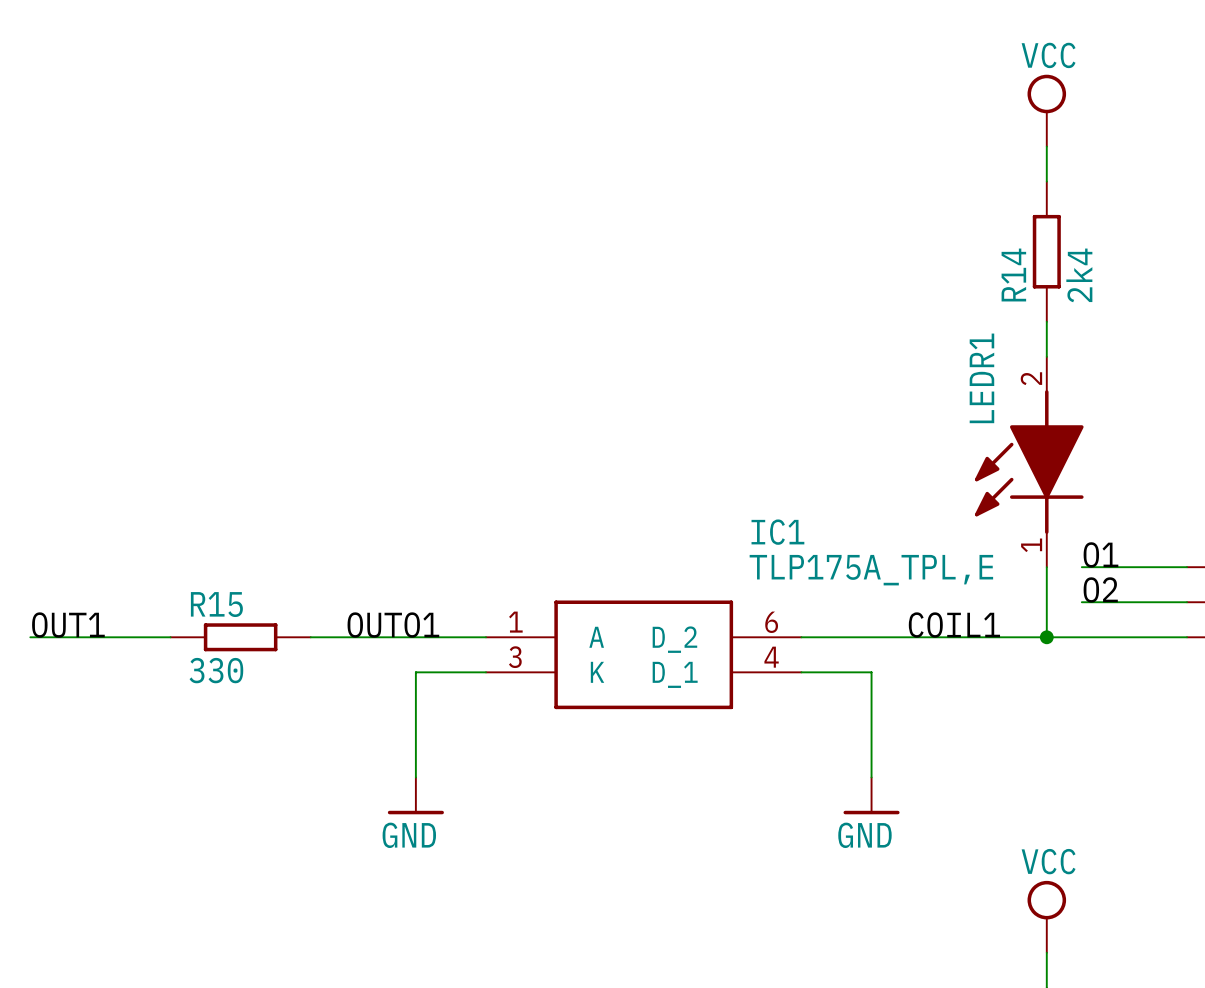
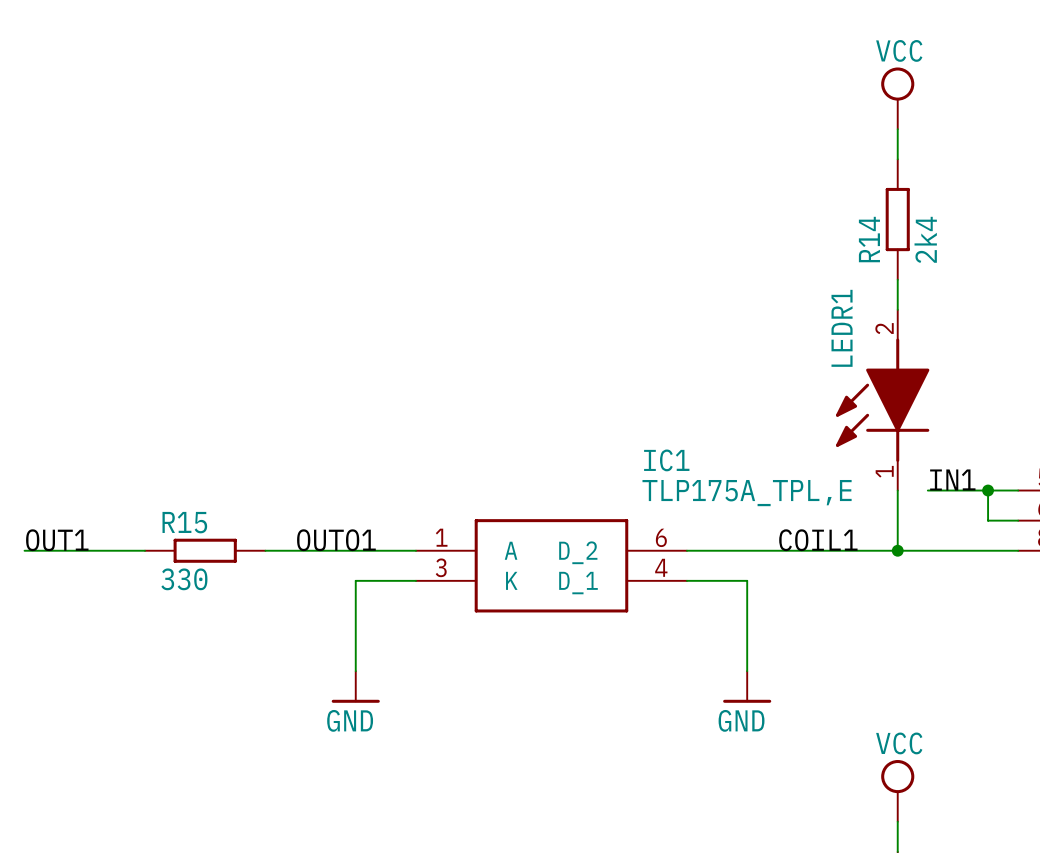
label: O1 (1100, 554) -> IN1 (952, 479)
junction: none -> (988, 490)
label: O2 (1100, 589) -> none
wire: (1081, 602) (1151, 602) -> (988, 490) (988, 520)

